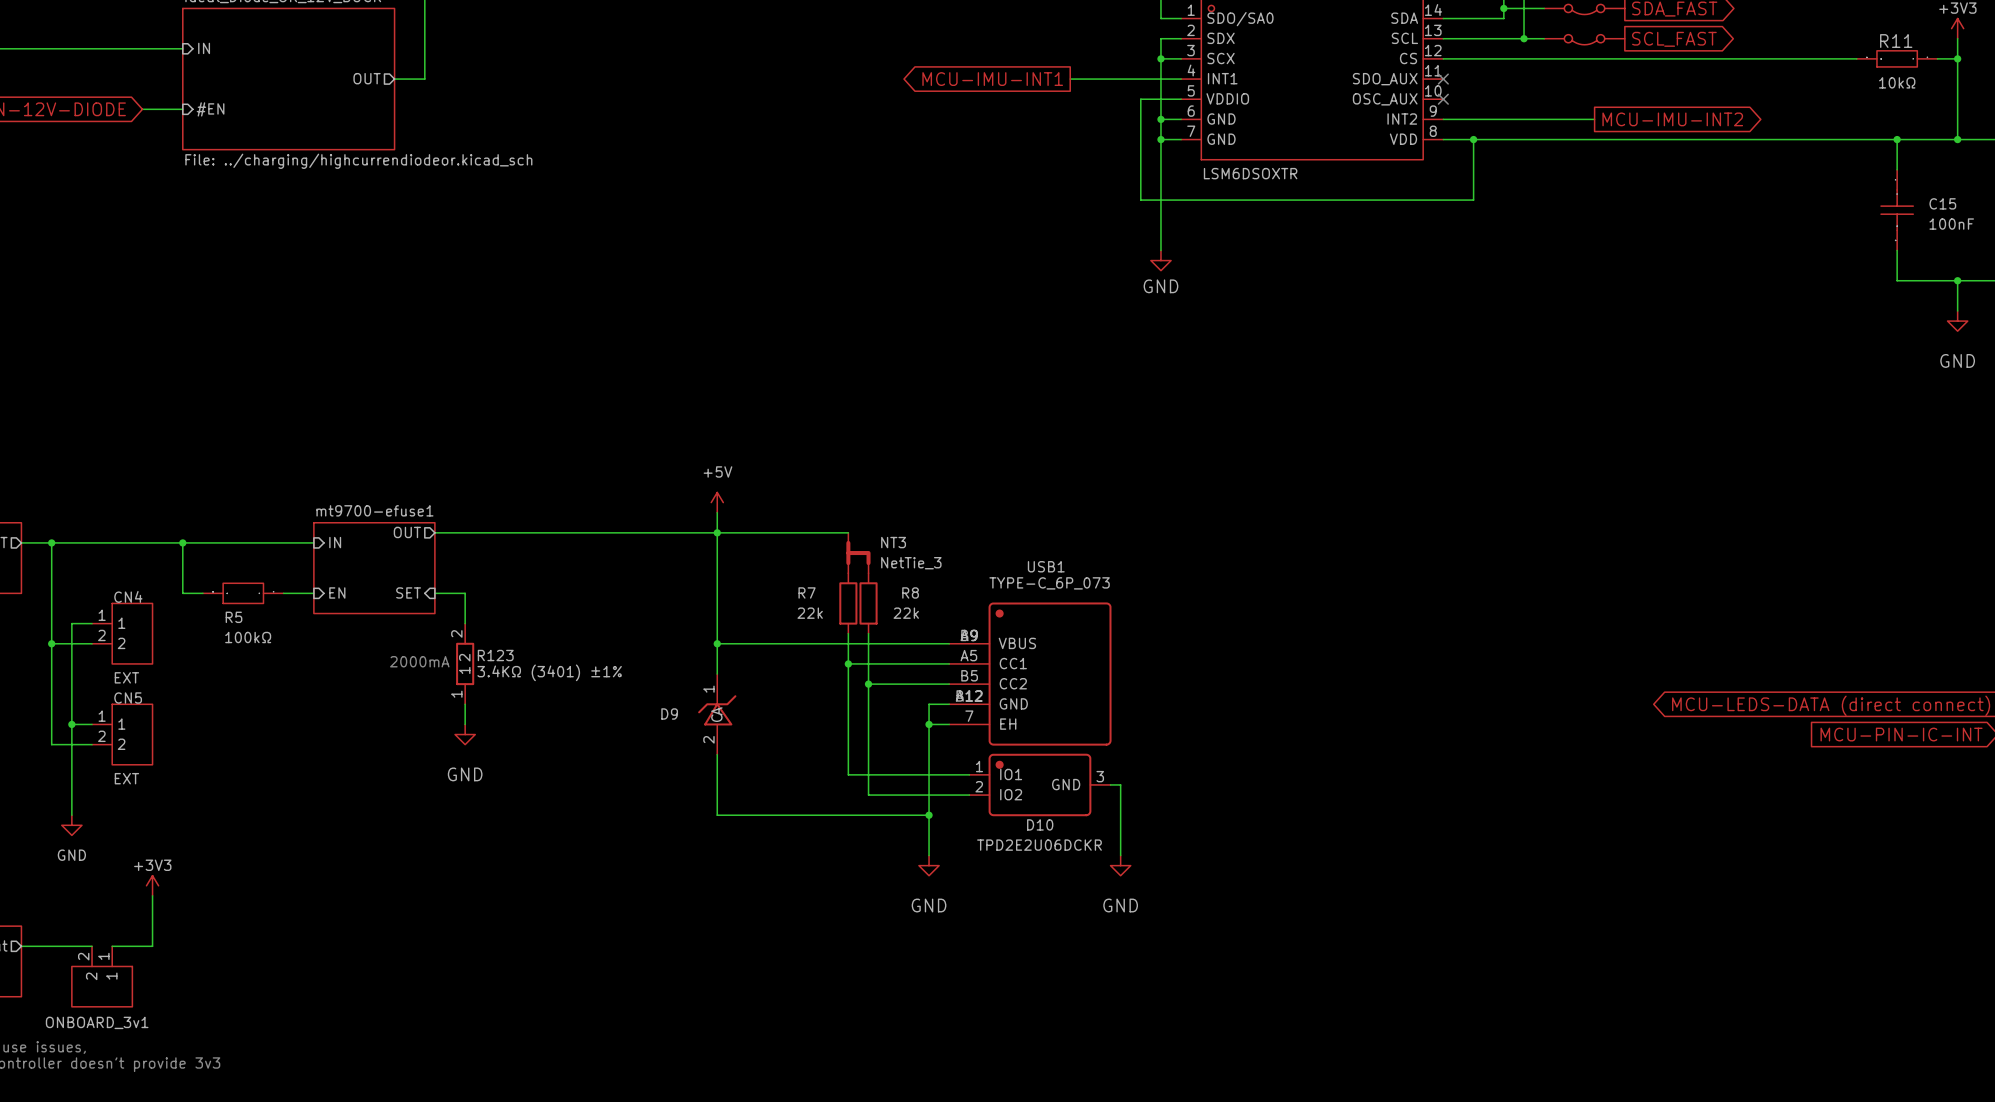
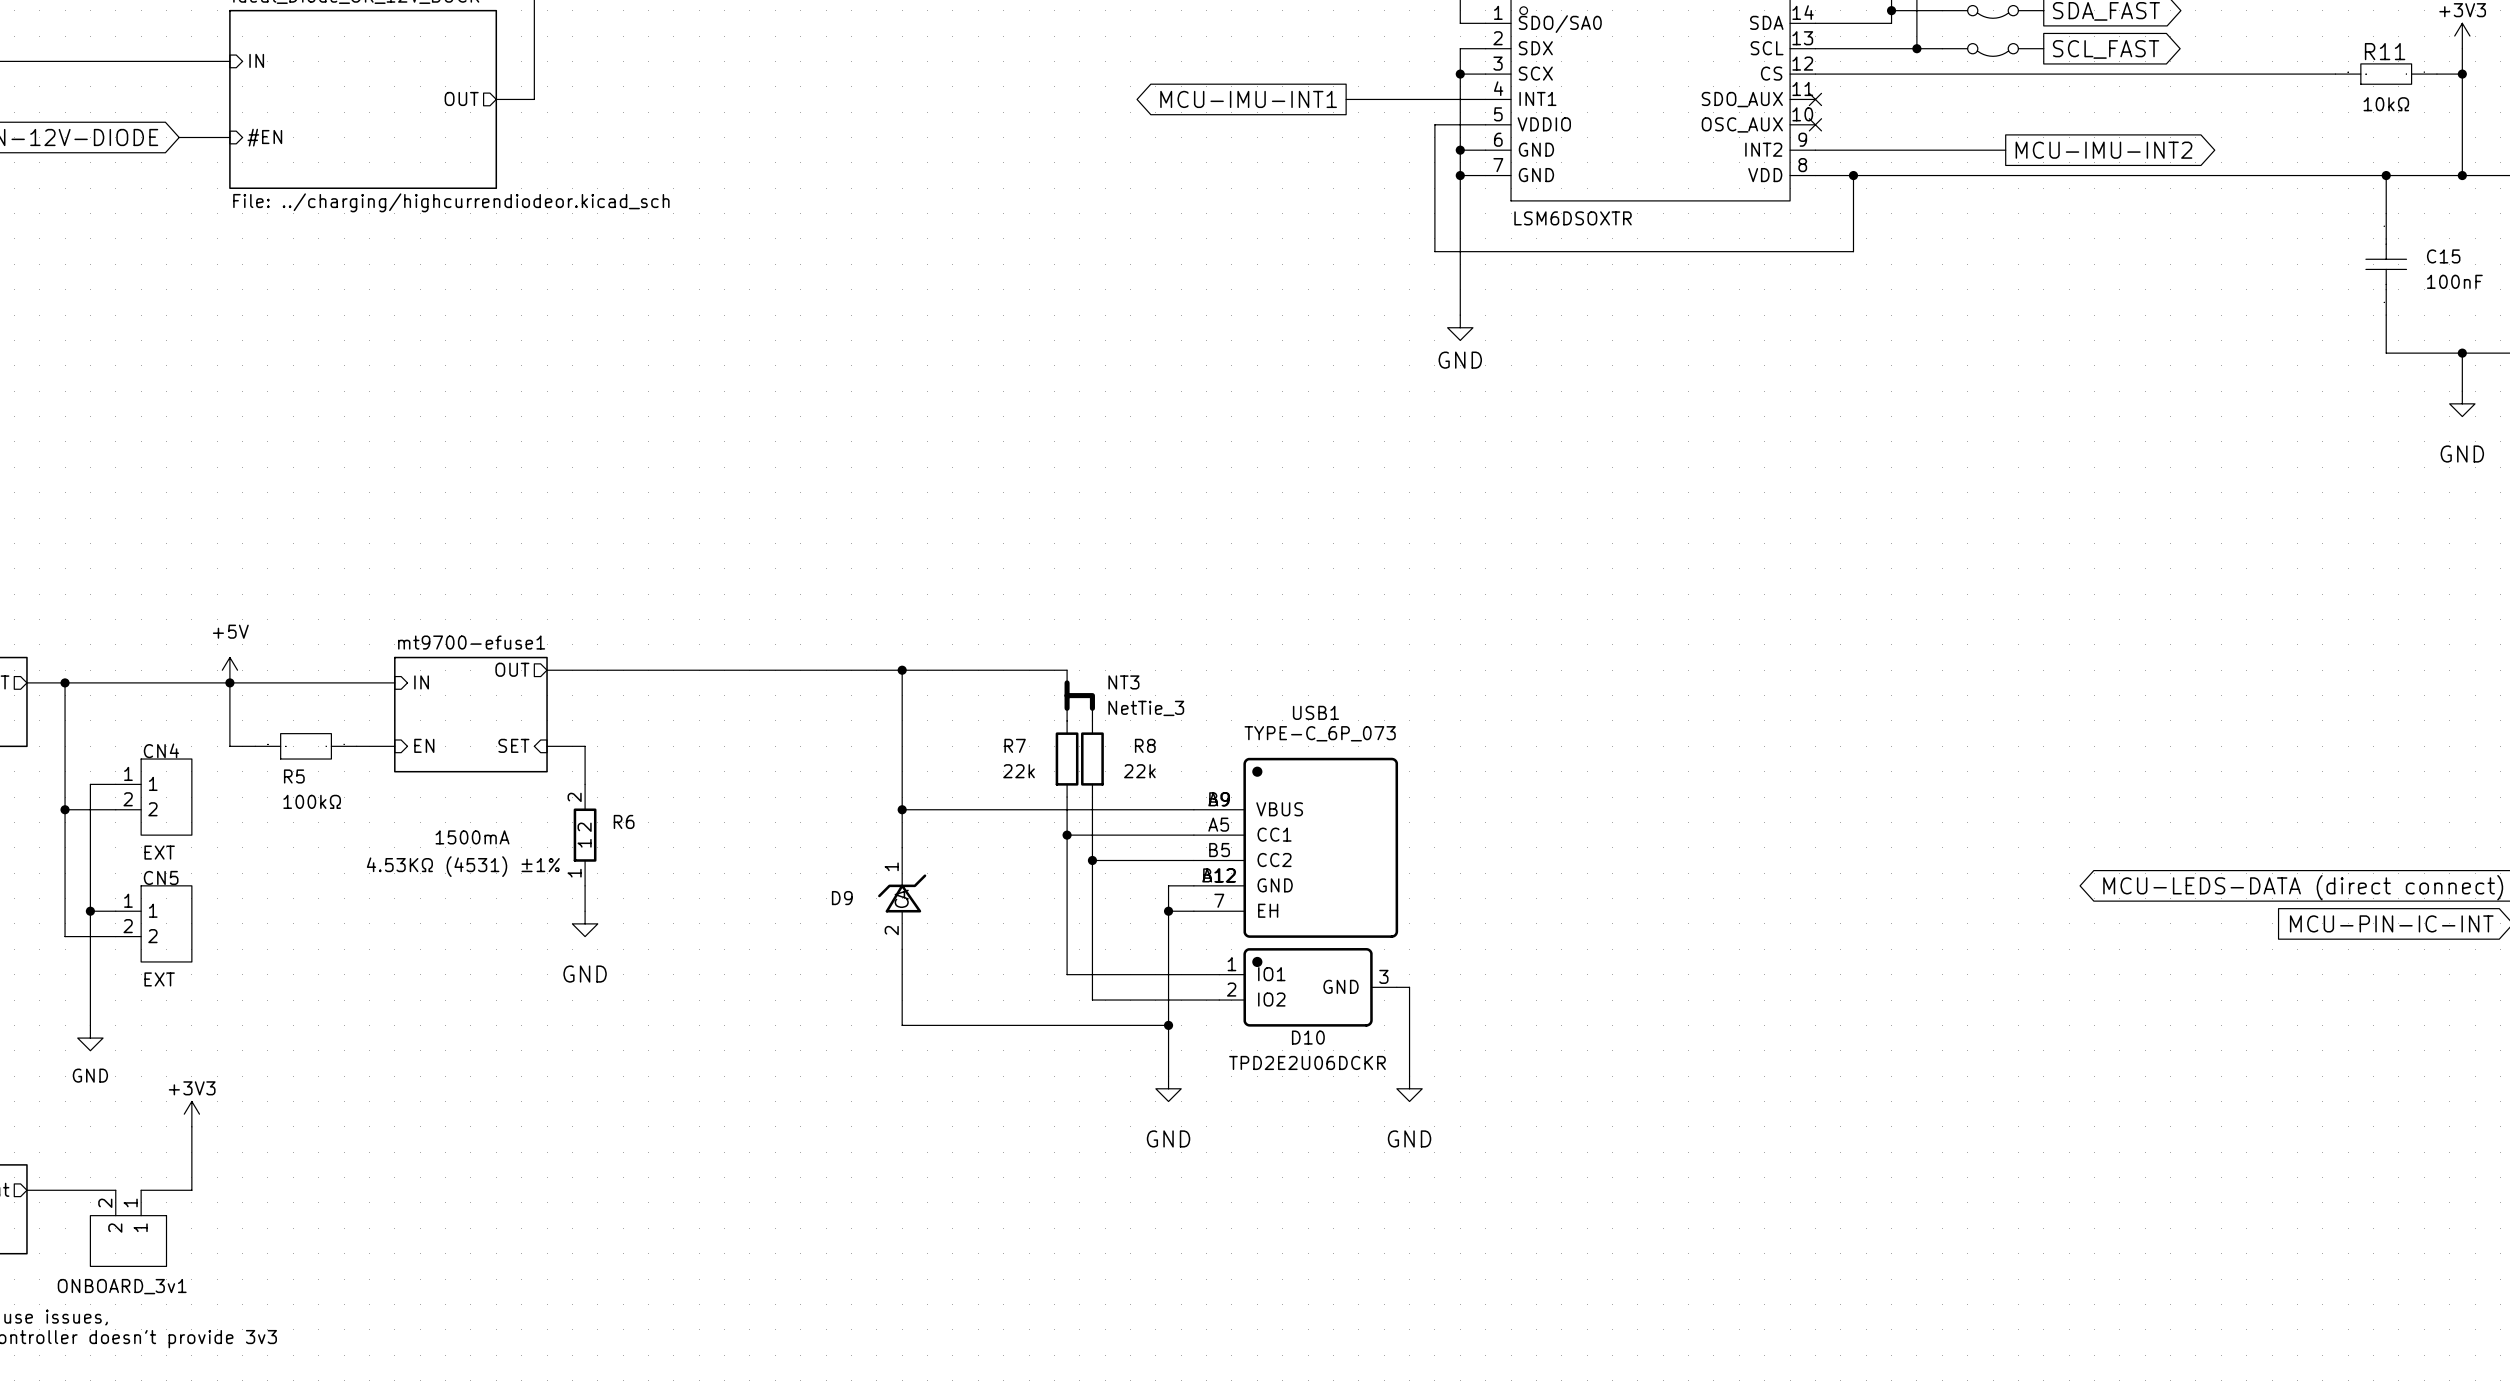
power symbol: +5V (717, 502) -> none
wire: (717, 512) (717, 532) -> none
power symbol: none -> +5V (229, 670)
R123 name: R123 (495, 655) -> R6 (624, 821)
text: 2000mA (419, 661) -> 1500mA (472, 837)
R123 text: 3.4KΩ (3401) ±1% (549, 672) -> 4.53KΩ (4531) ±1% (463, 866)

